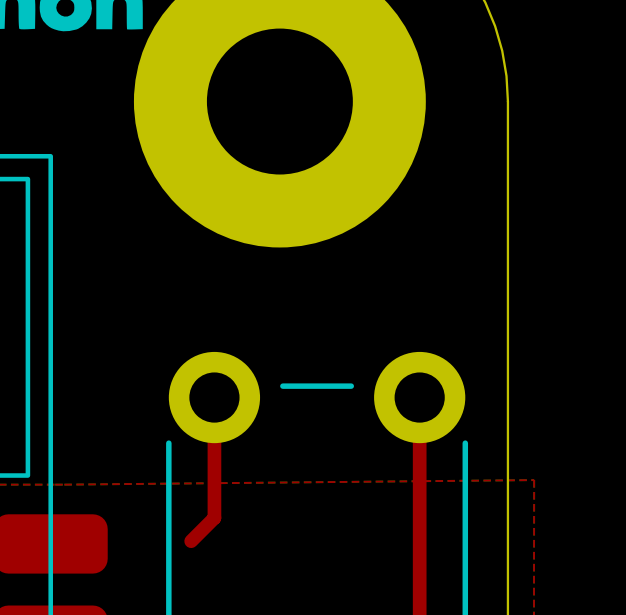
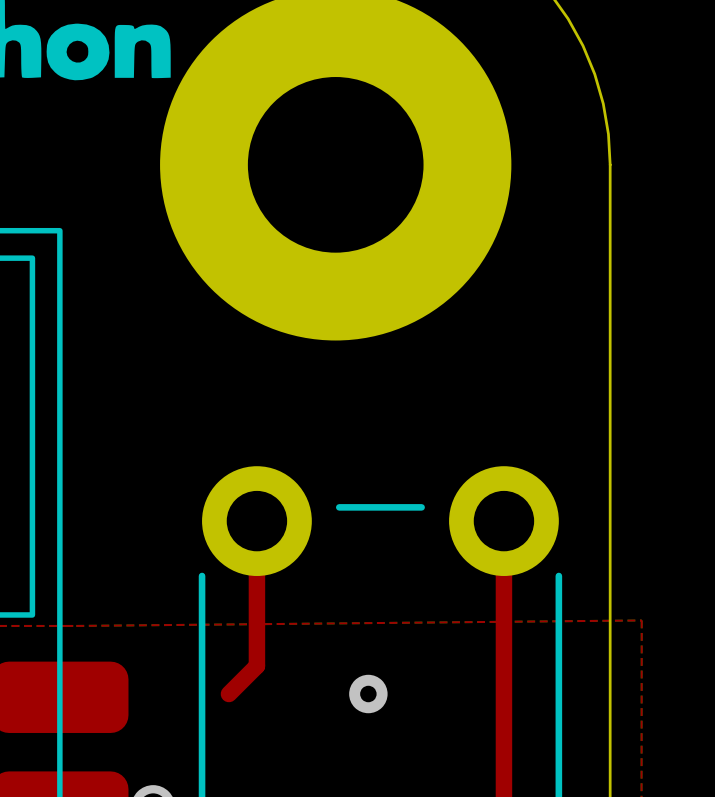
via: none -> (368, 694)

